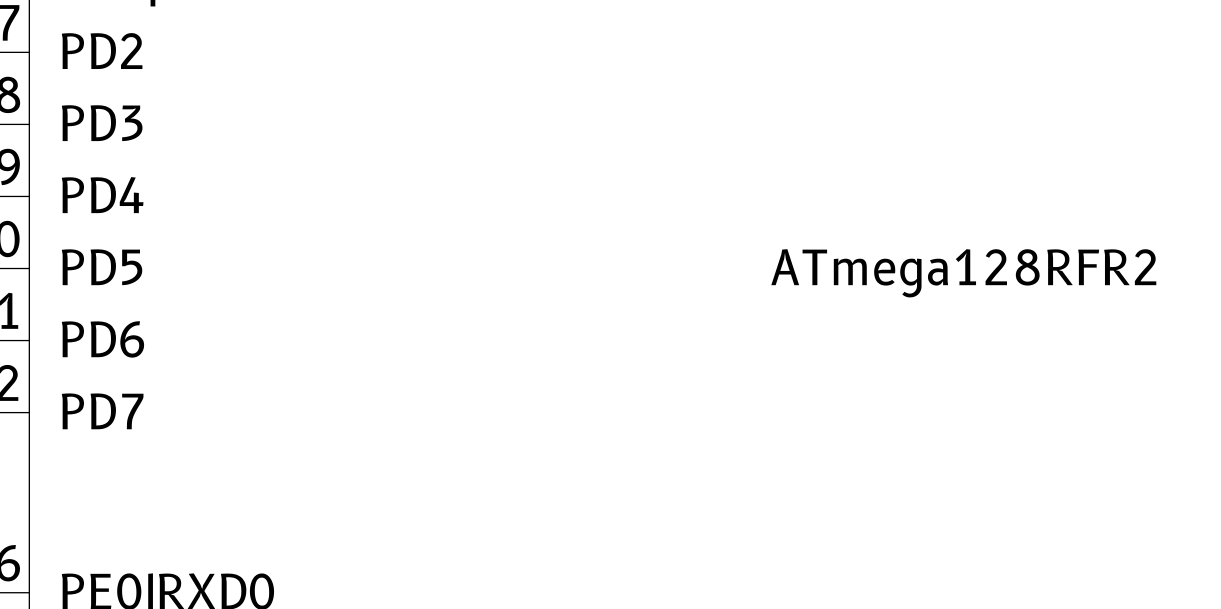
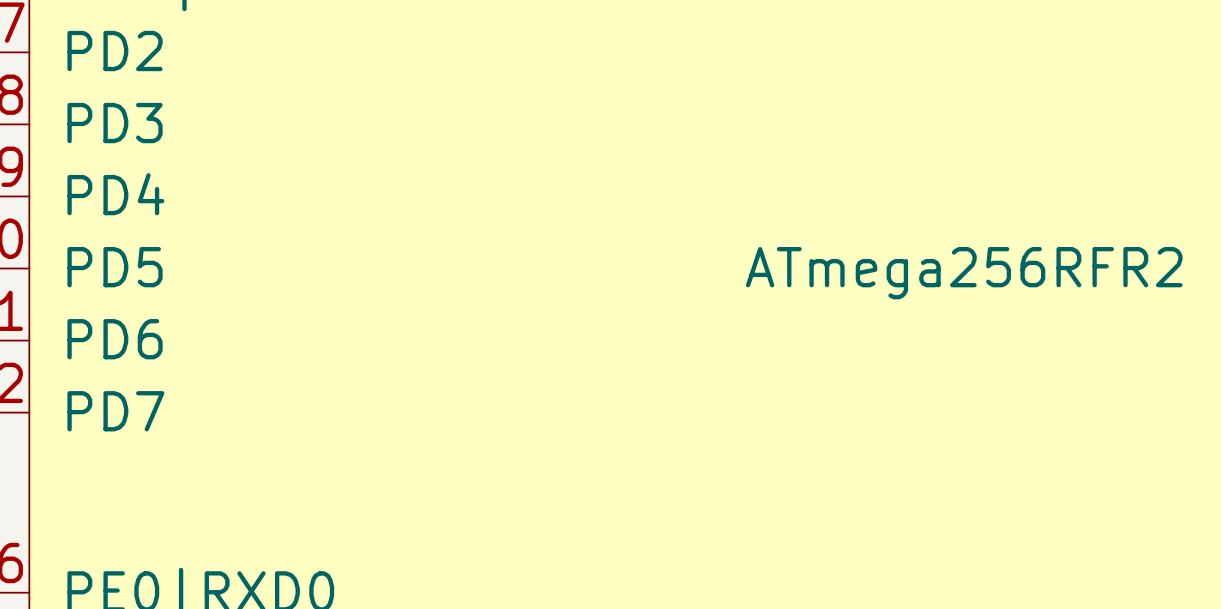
part value: ATmega128RFR2 (963, 273) -> ATmega256RFR2 (964, 273)

